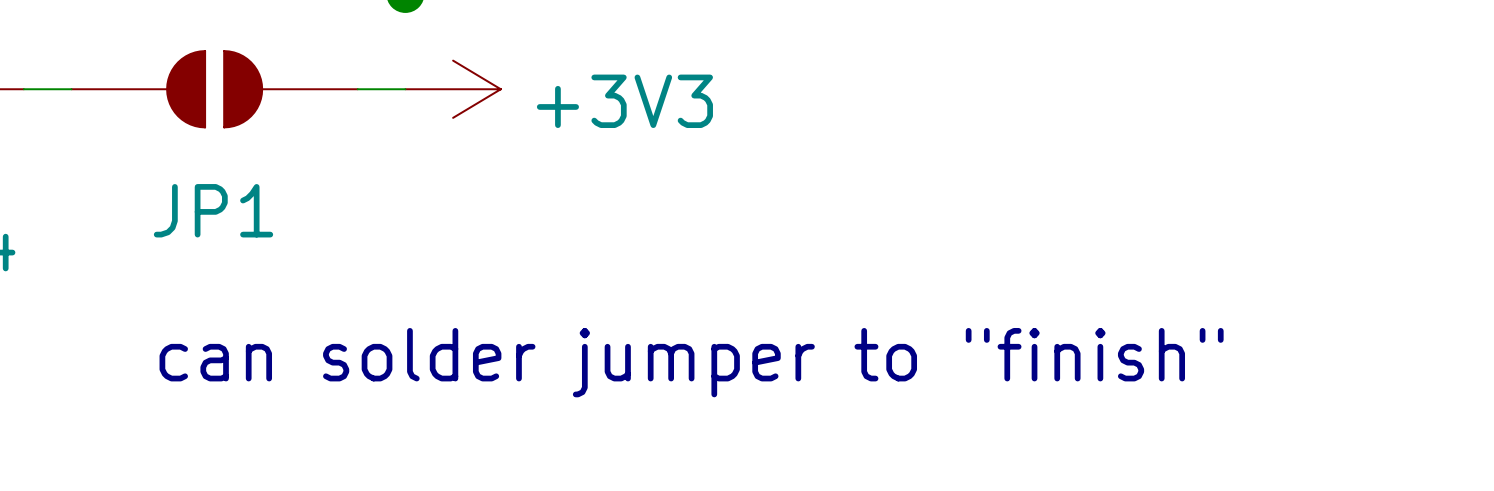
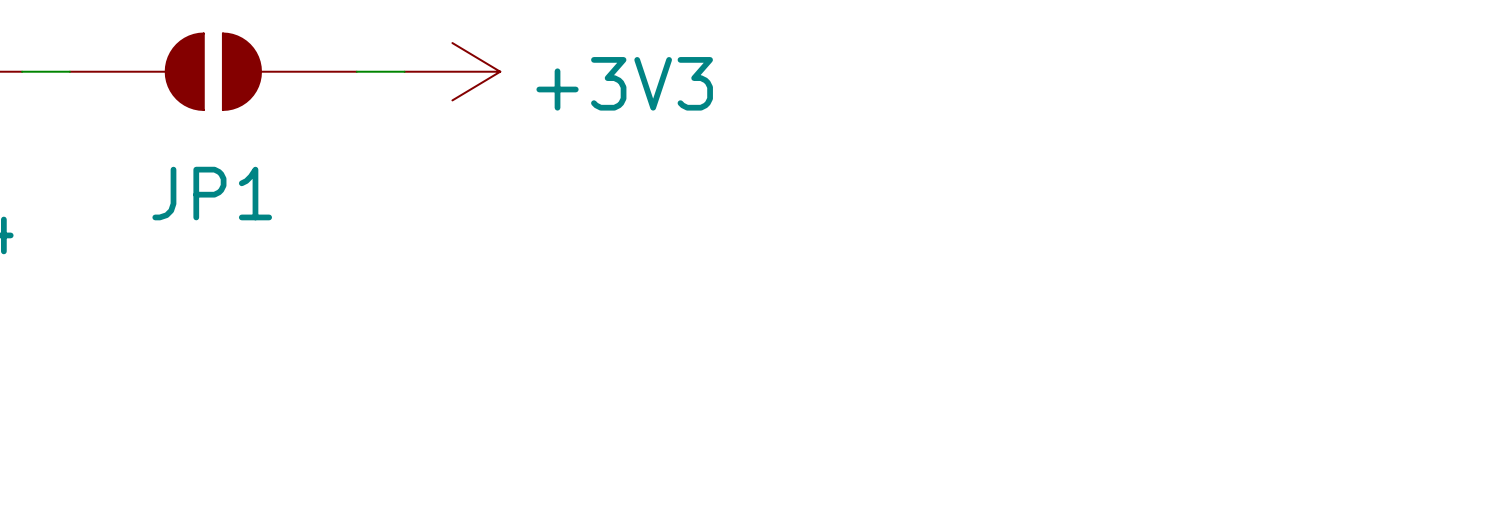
text: can solder jumper to "finish" (691, 362) -> none

